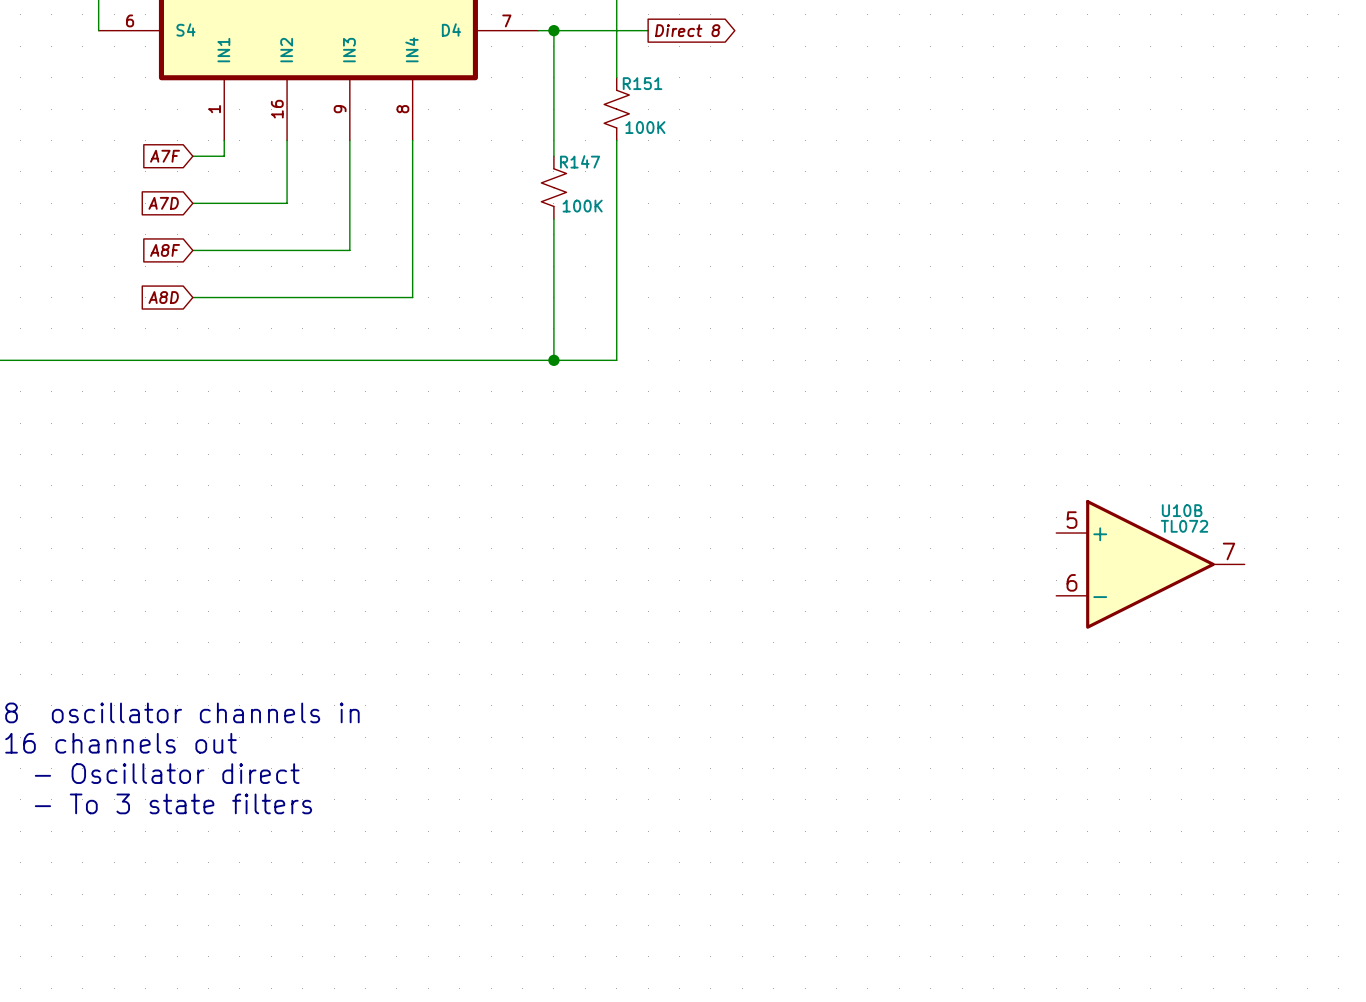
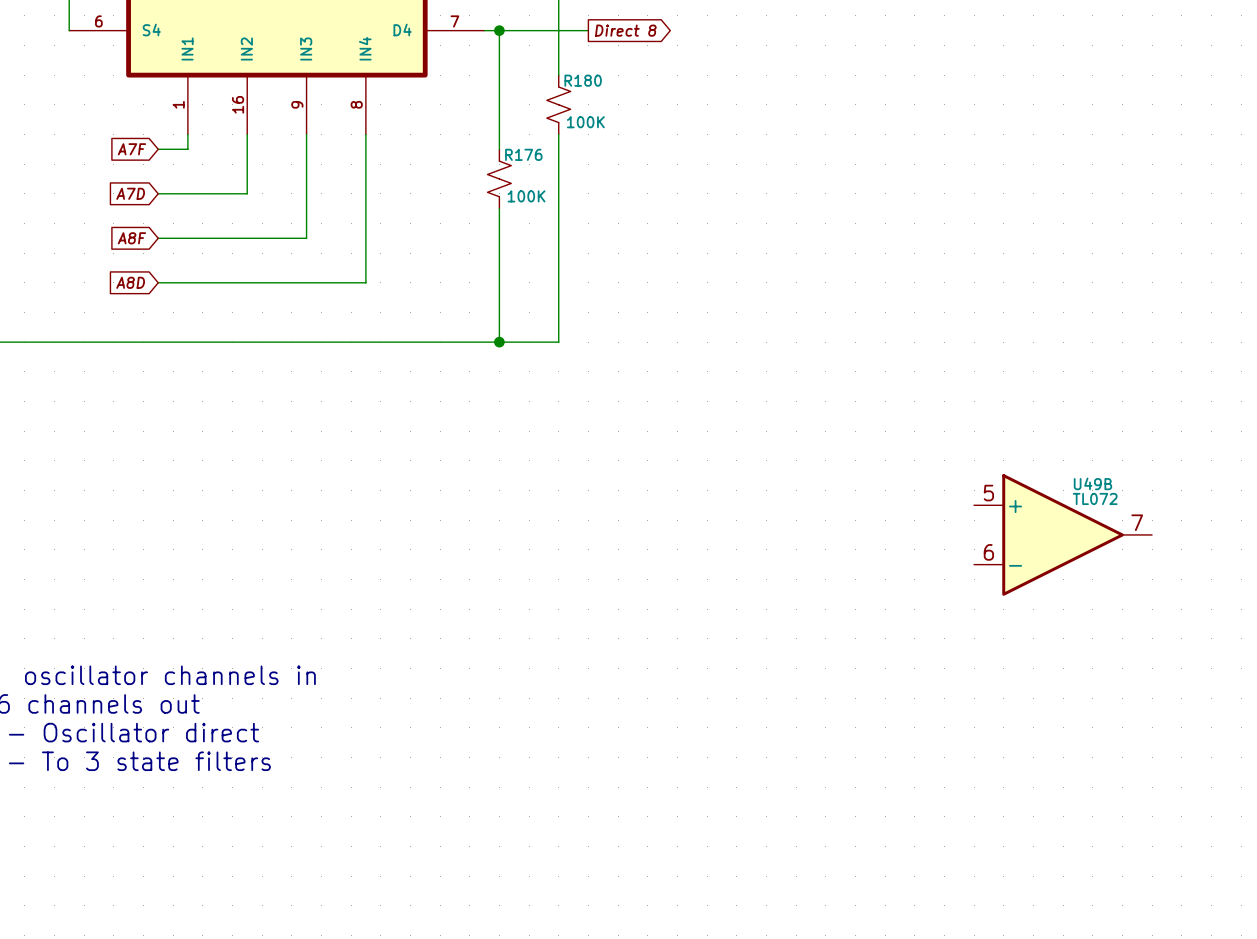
R151 name: R151 (642, 83) -> R180 (583, 80)
R147 name: R147 (580, 161) -> R176 (523, 154)
U10B name: U10B (1182, 510) -> U49B (1092, 483)

